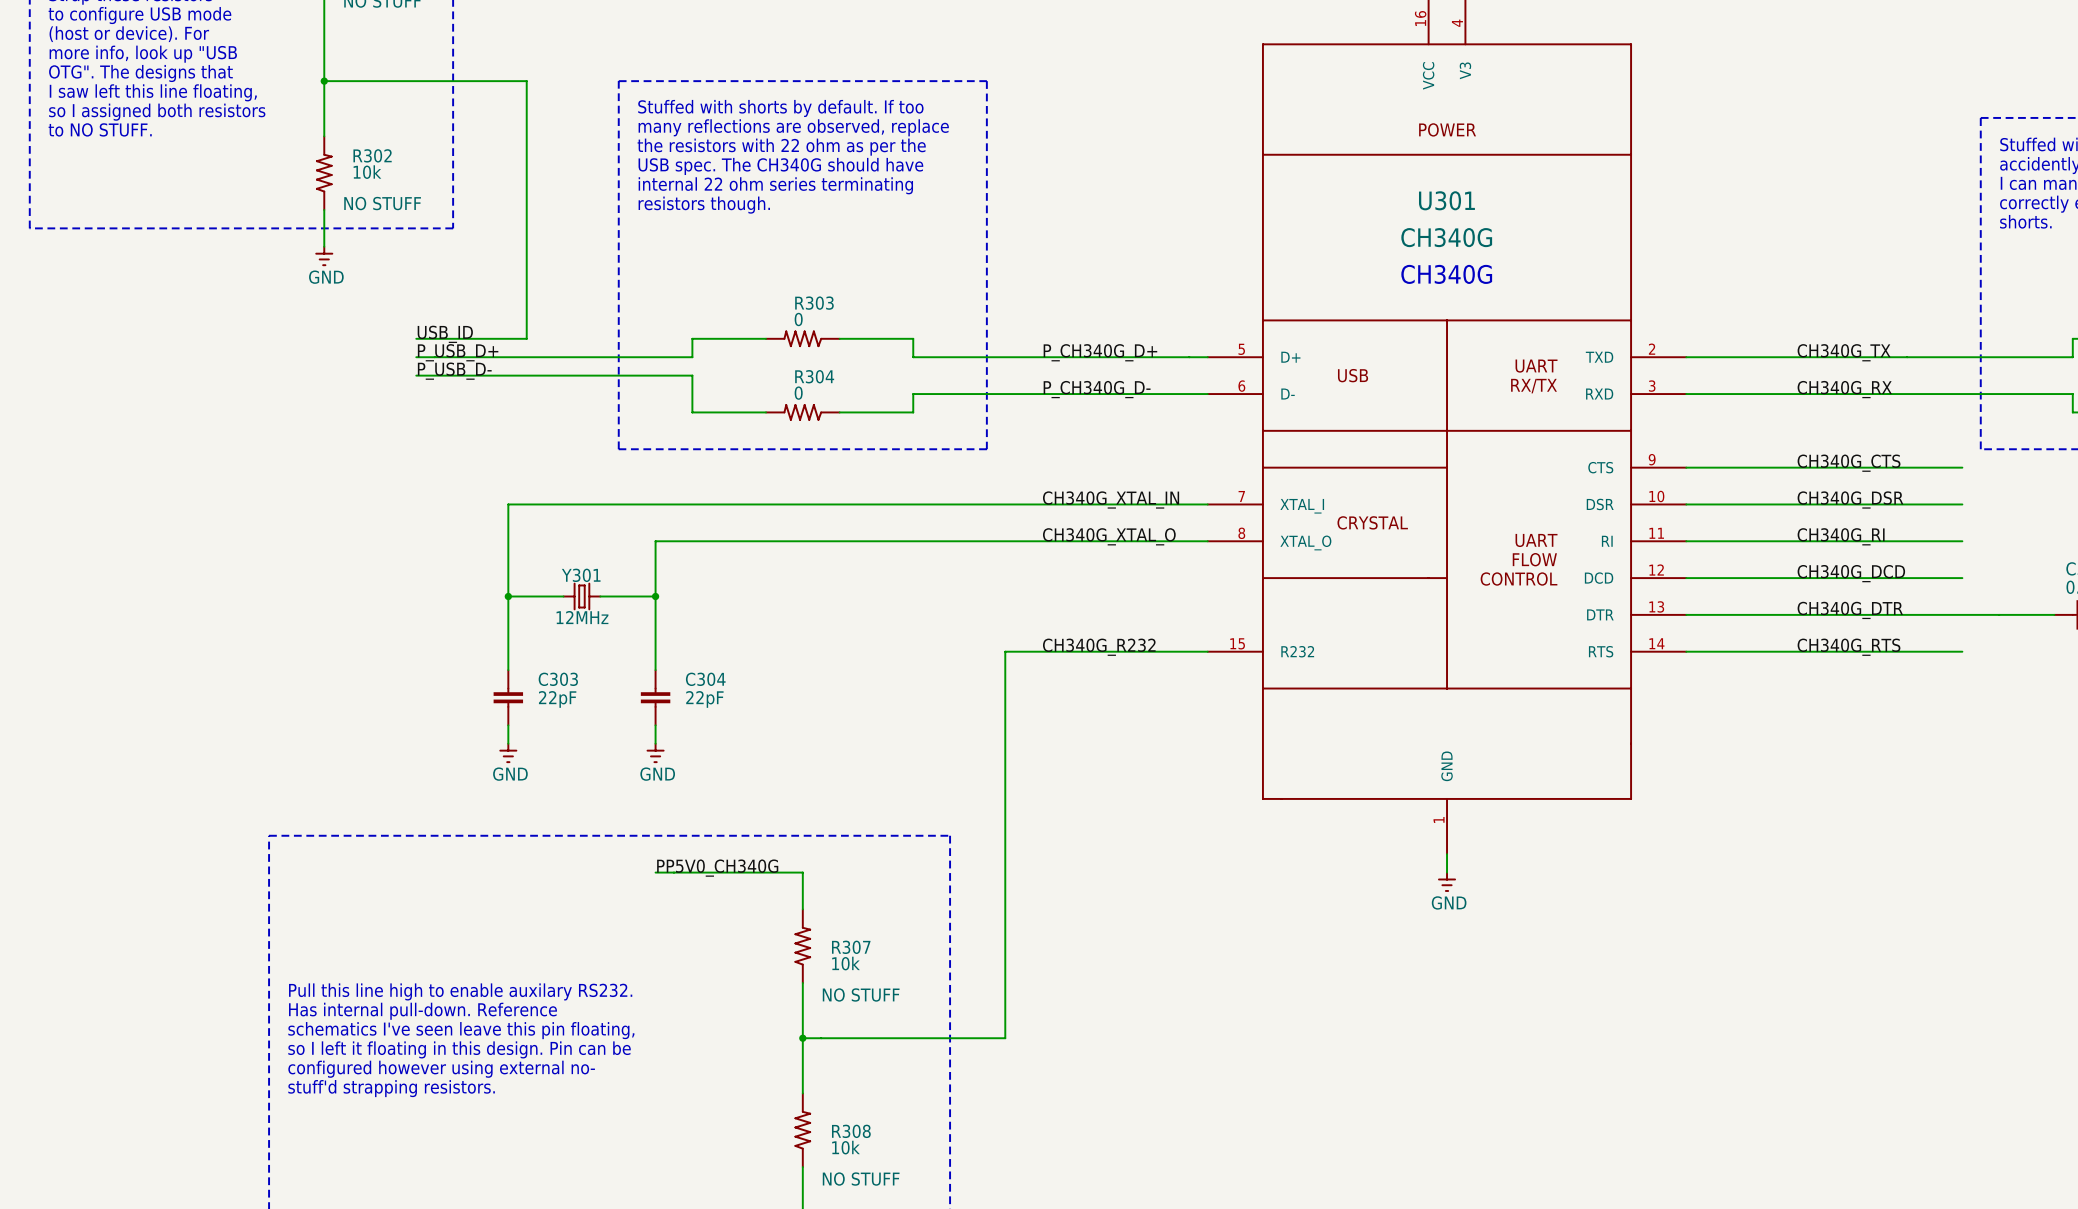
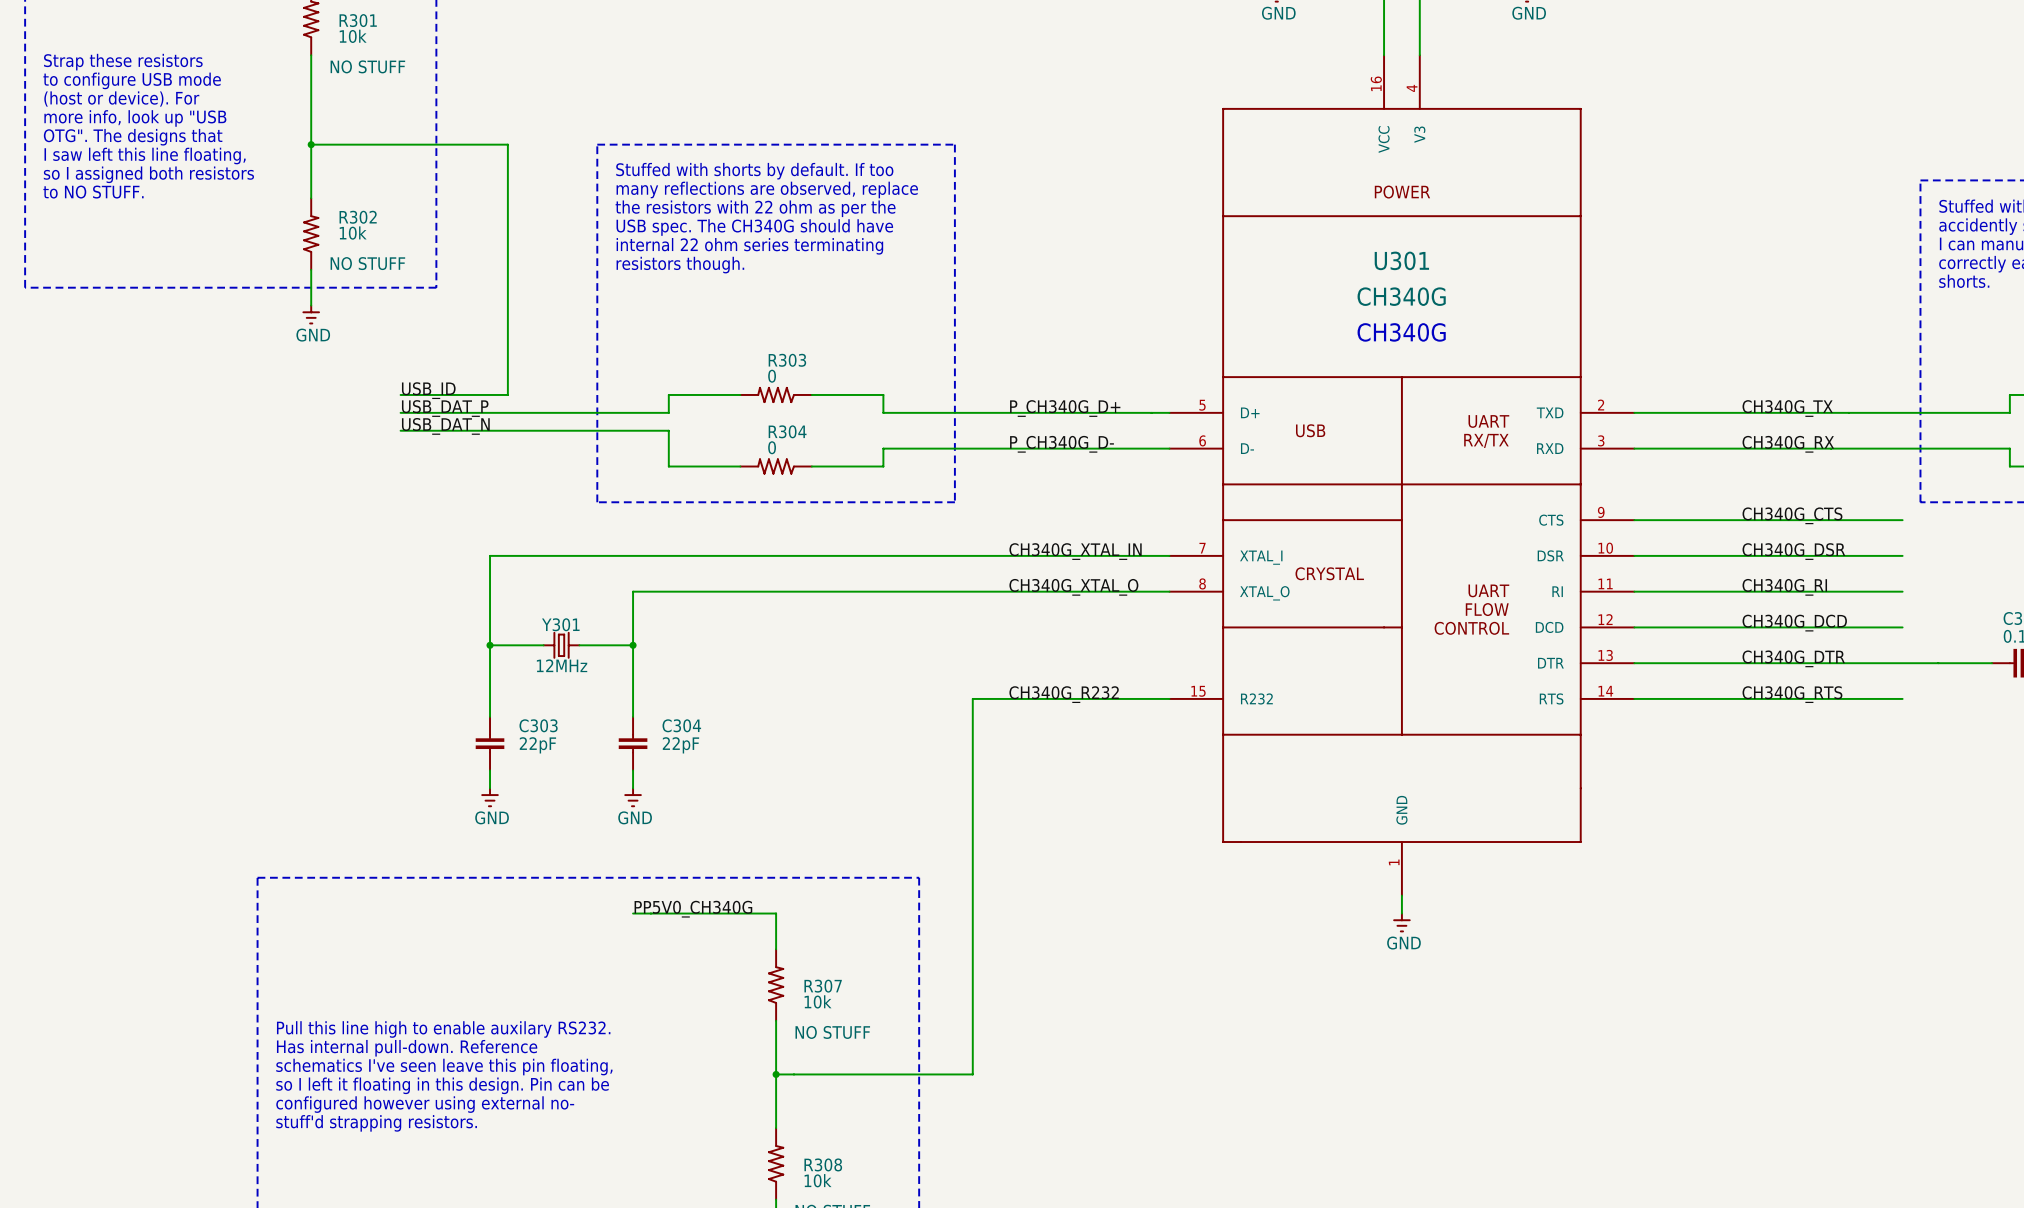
label: P_USB_D+ (458, 352) -> USB_DAT_P (445, 408)
label: P_USB_D- (454, 371) -> USB_DAT_N (445, 426)

